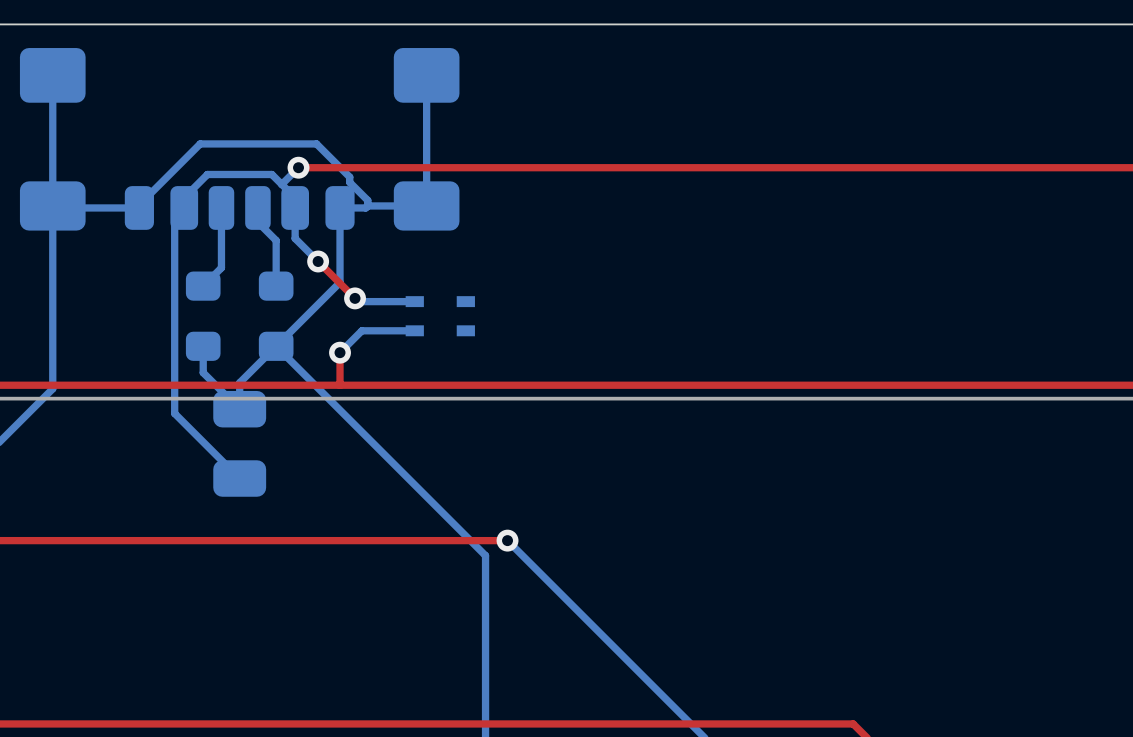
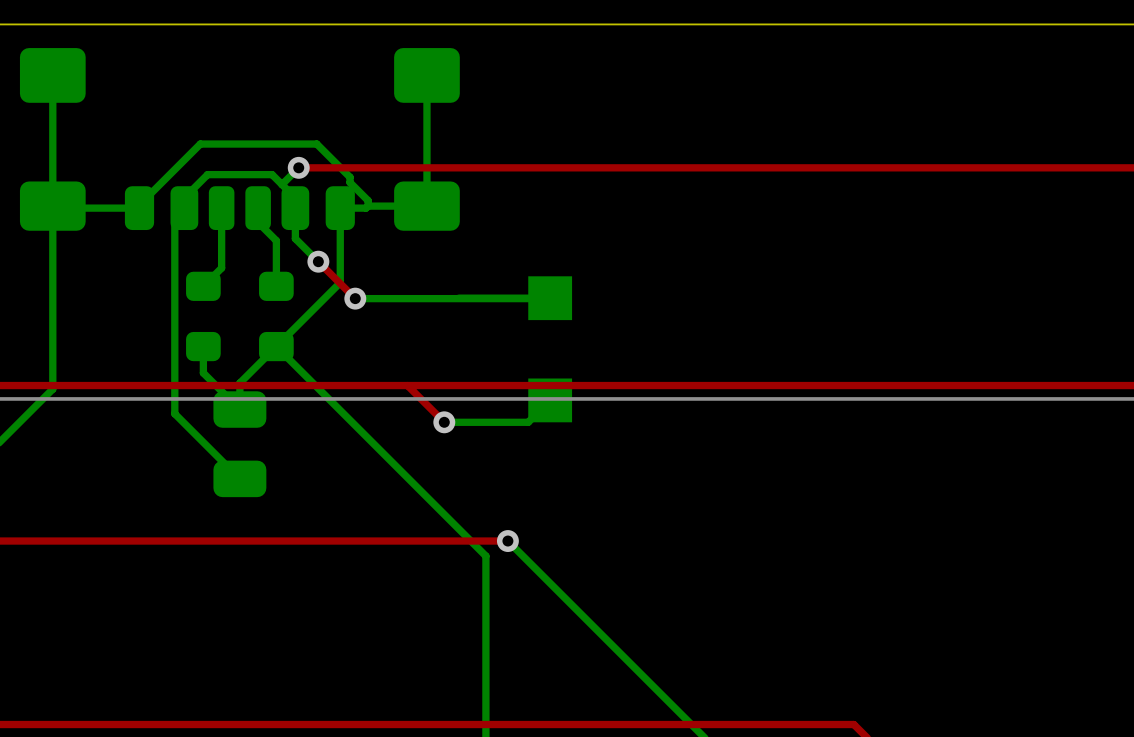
bottom track: (355, 298) (358, 301) (414, 301) -> (355, 298) (549, 298)
part: (440, 316) -> none
bottom track: (414, 330) (361, 330) (340, 352) -> none
part: none -> (550, 349)
top track: (340, 352) (340, 385) -> none
via position: (340, 352) -> (444, 422)
top track: none -> (407, 385) (444, 422)
bottom track: none -> (550, 400) (528, 422) (444, 422)

